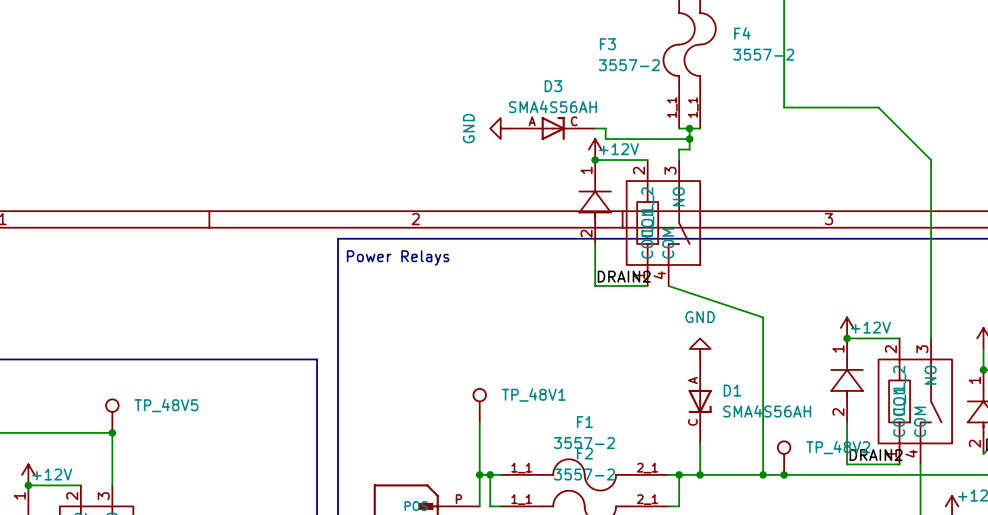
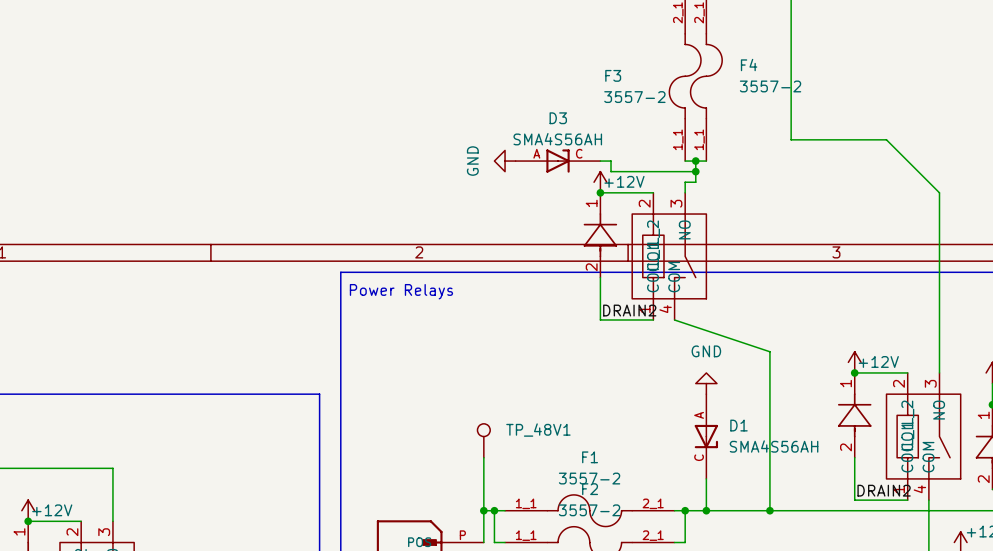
TP_48V5: (112, 416) -> none
junction: (112, 432) -> none
TP_48V2: (784, 458) -> none
junction: (784, 474) -> none

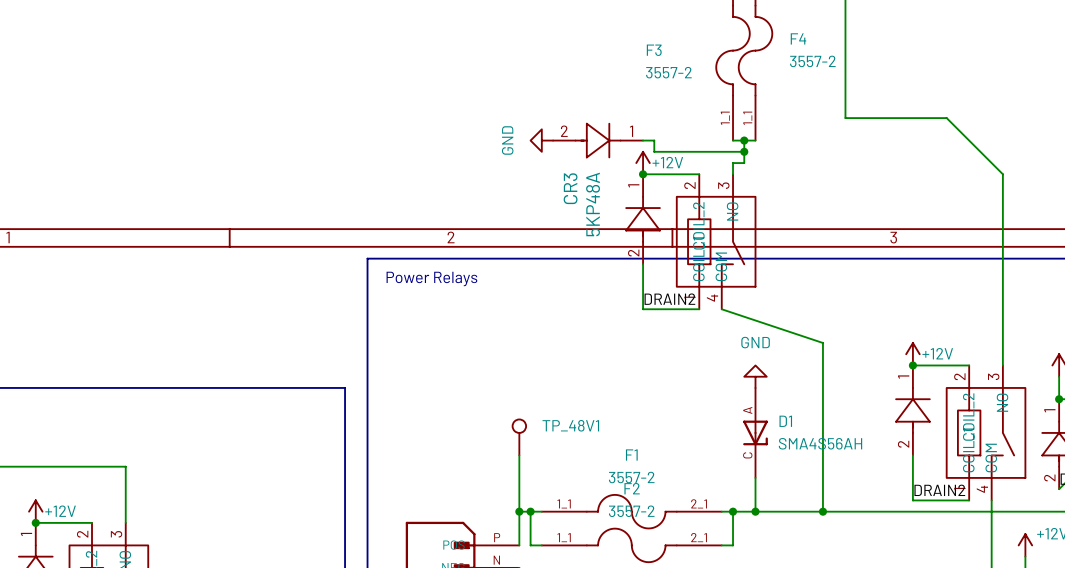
D3: SMA4S56AH (558, 161) -> none
CR3: none -> 5KP48A (598, 140)

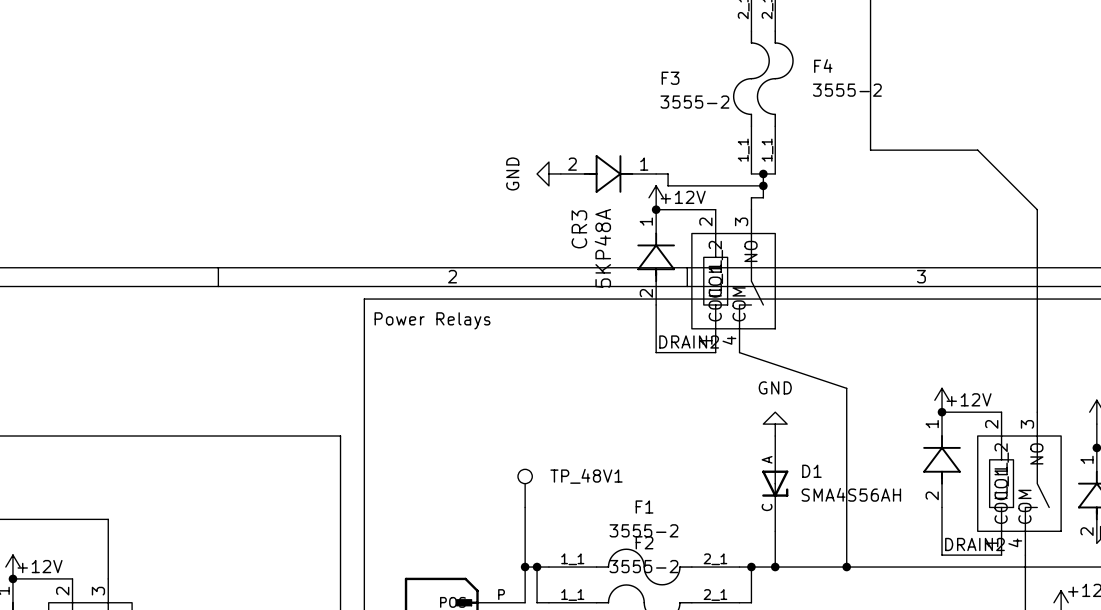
F4 value: 3557-2 (812, 61) -> 3555-2 (847, 90)
F3 value: 3557-2 (668, 72) -> 3555-2 (694, 102)
F1 value: 3557-2 (631, 477) -> 3555-2 (643, 530)
F2 value: 3557-2 (631, 511) -> 3555-2 (643, 566)

